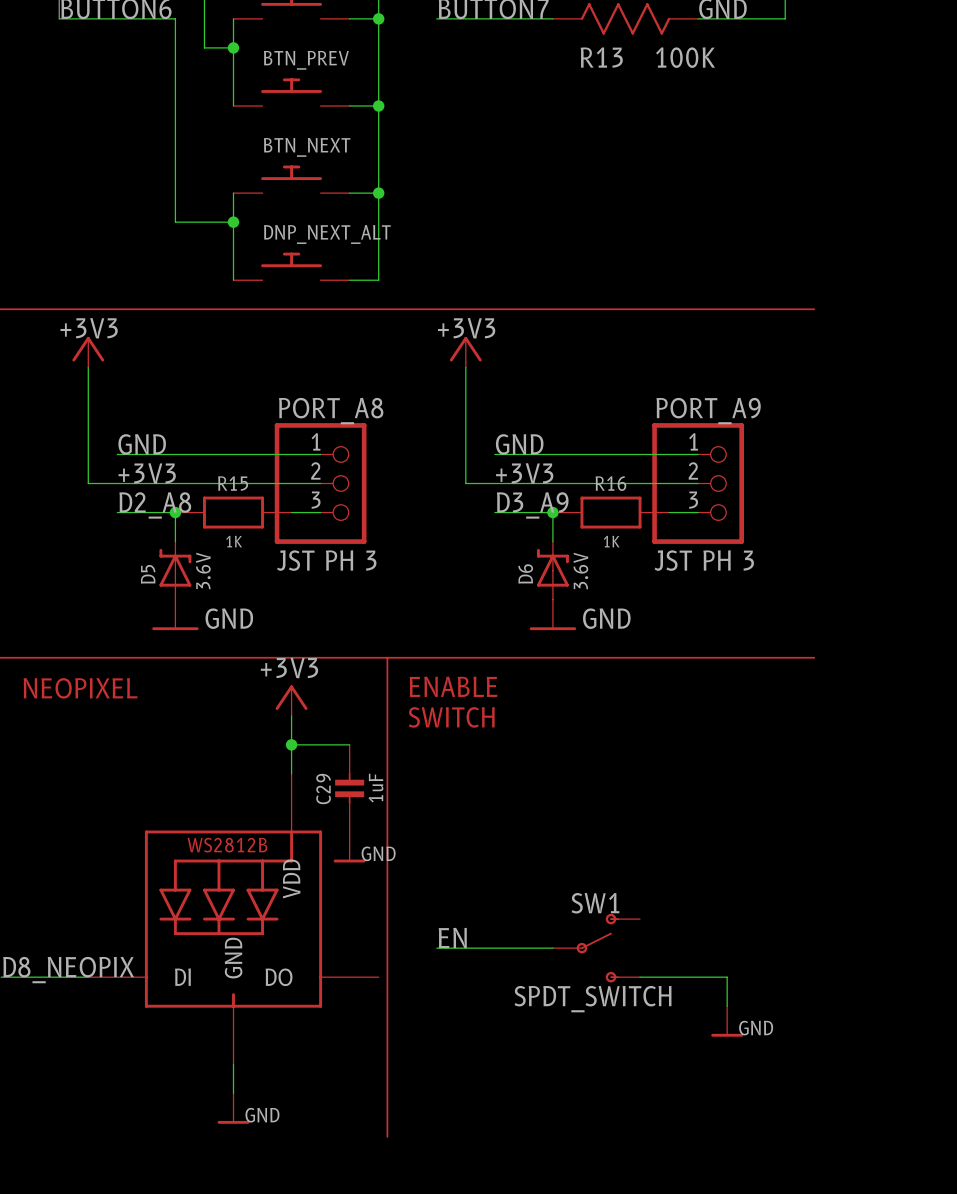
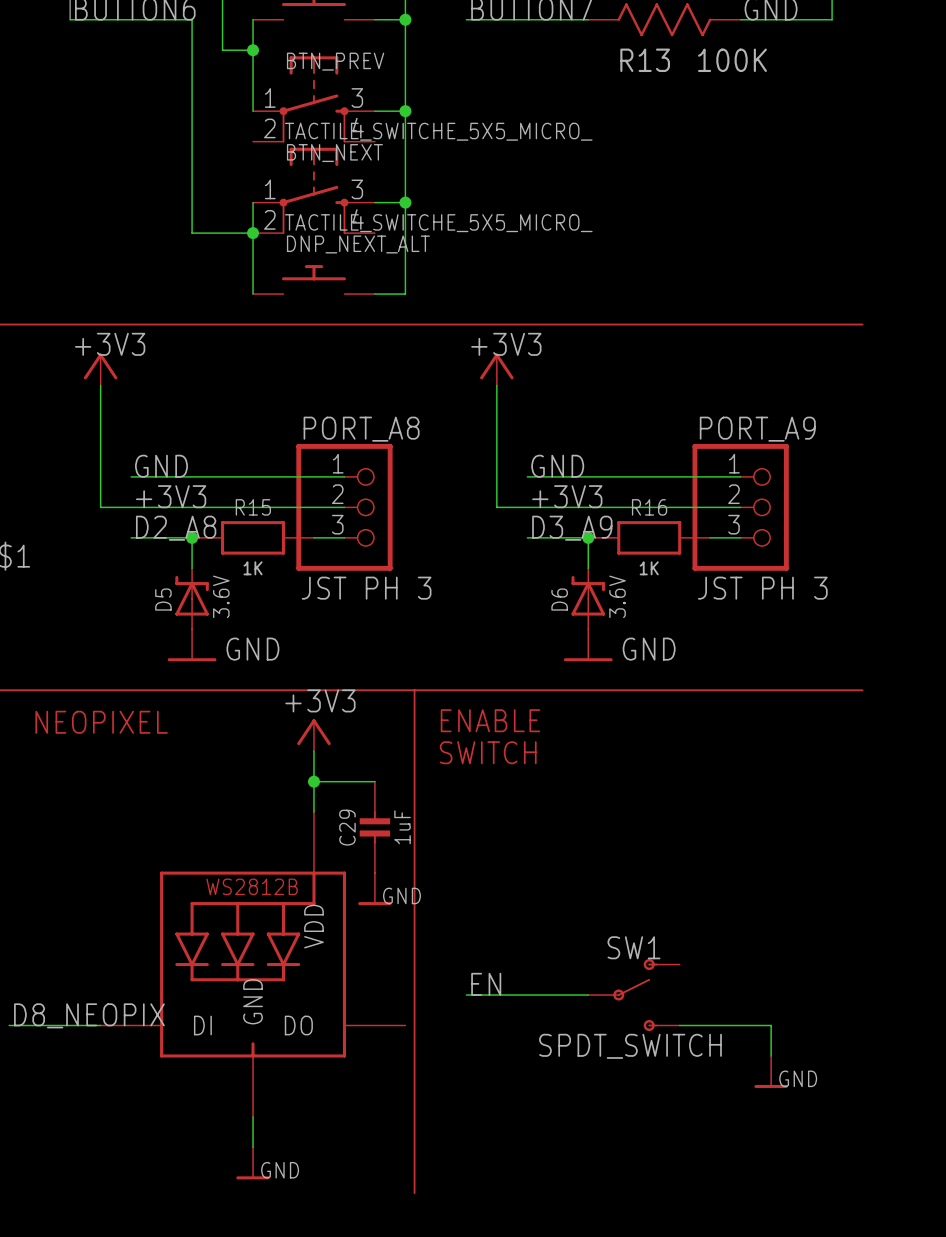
BTN_PREV symbol: [233, 78, 350, 107] -> [253, 56, 375, 143]
BTN_PREV value: none -> TACTILE_SWITCHE_5X5_MICRO_ (438, 131)
BTN_NEXT symbol: [233, 165, 350, 194] -> [253, 147, 375, 235]
BTN_NEXT value: none -> TACTILE_SWITCHE_5X5_MICRO_ (438, 223)

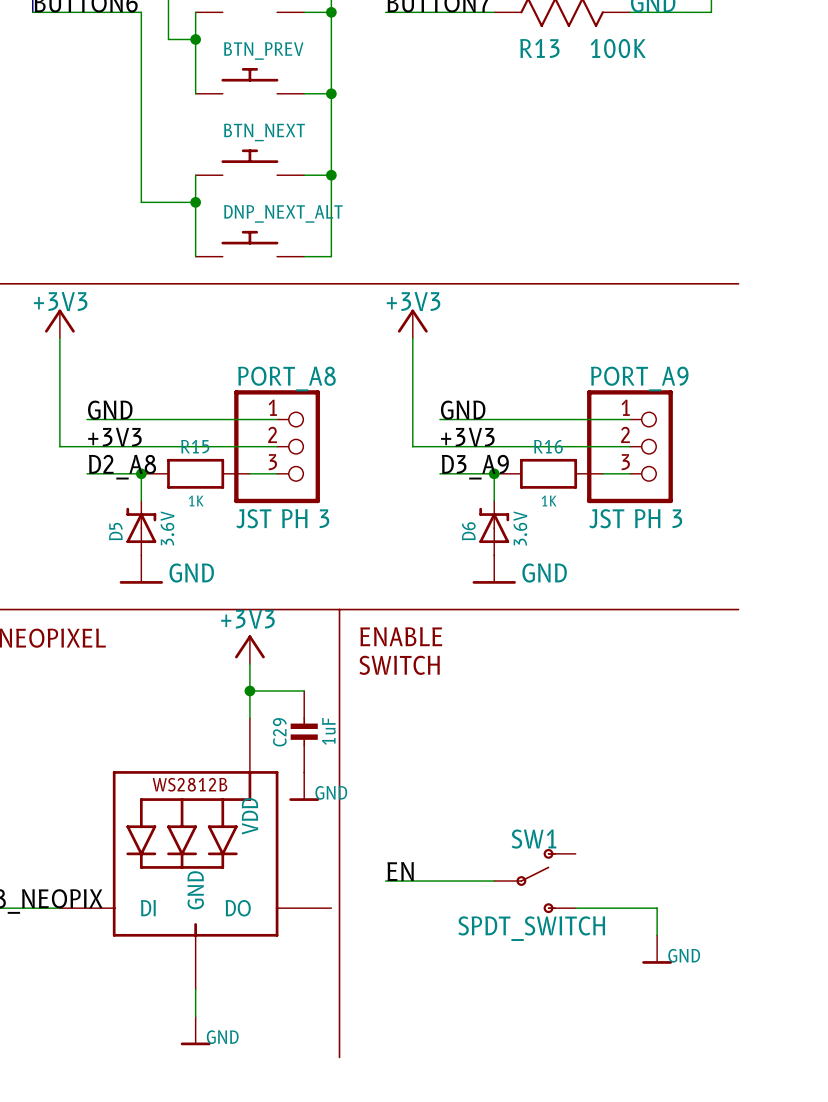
BTN_PREV symbol: [253, 56, 375, 143] -> [195, 67, 305, 94]
BTN_PREV value: TACTILE_SWITCHE_5X5_MICRO_ (438, 131) -> none
BTN_NEXT symbol: [253, 147, 375, 235] -> [195, 149, 305, 176]
BTN_NEXT value: TACTILE_SWITCHE_5X5_MICRO_ (438, 223) -> none

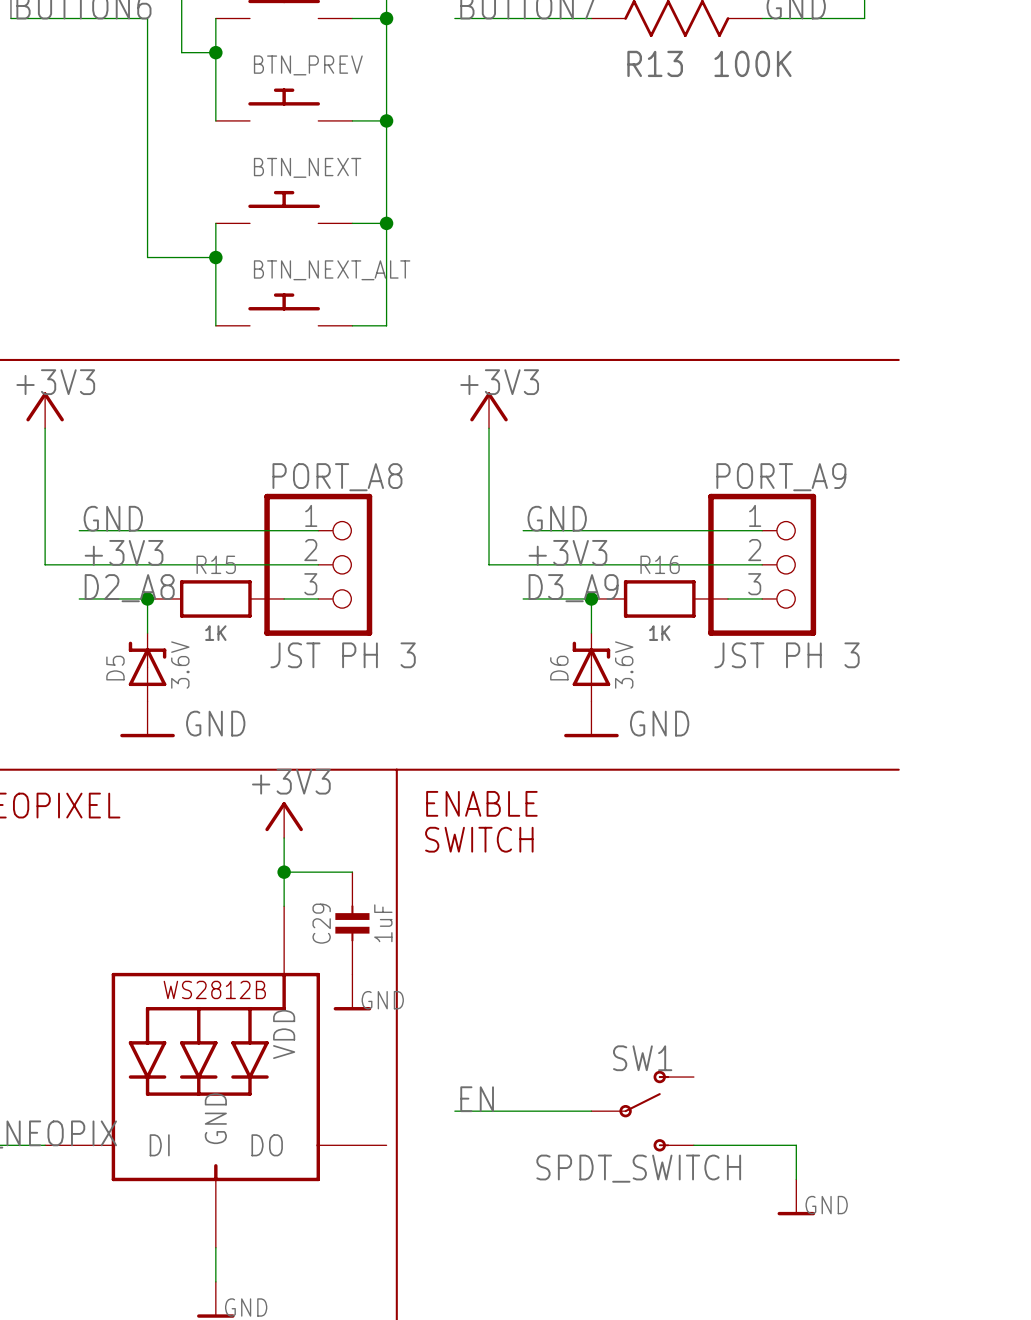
DNP_NEXT_ALT name: DNP_NEXT_ALT (283, 213) -> BTN_NEXT_ALT (332, 270)

